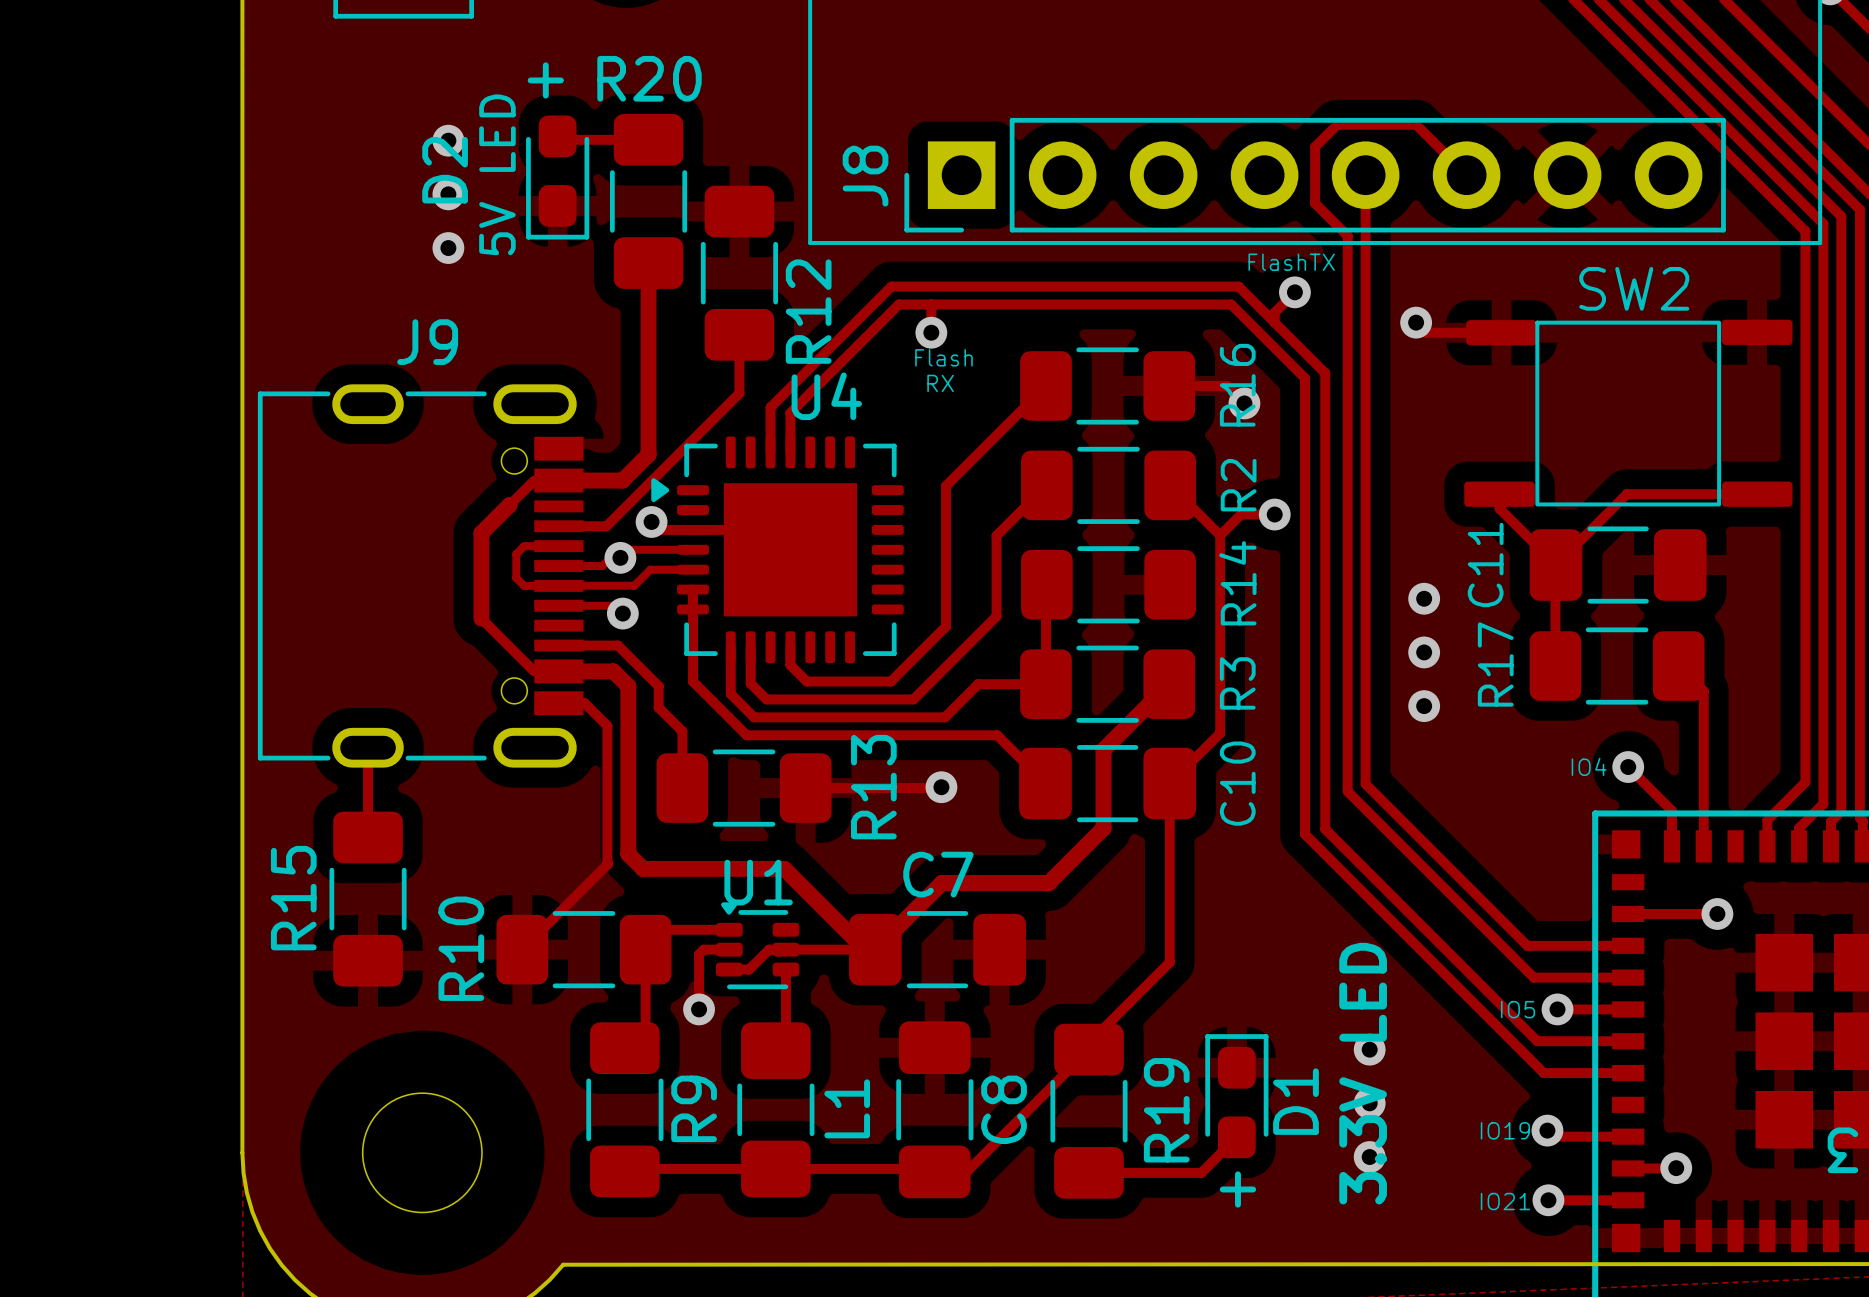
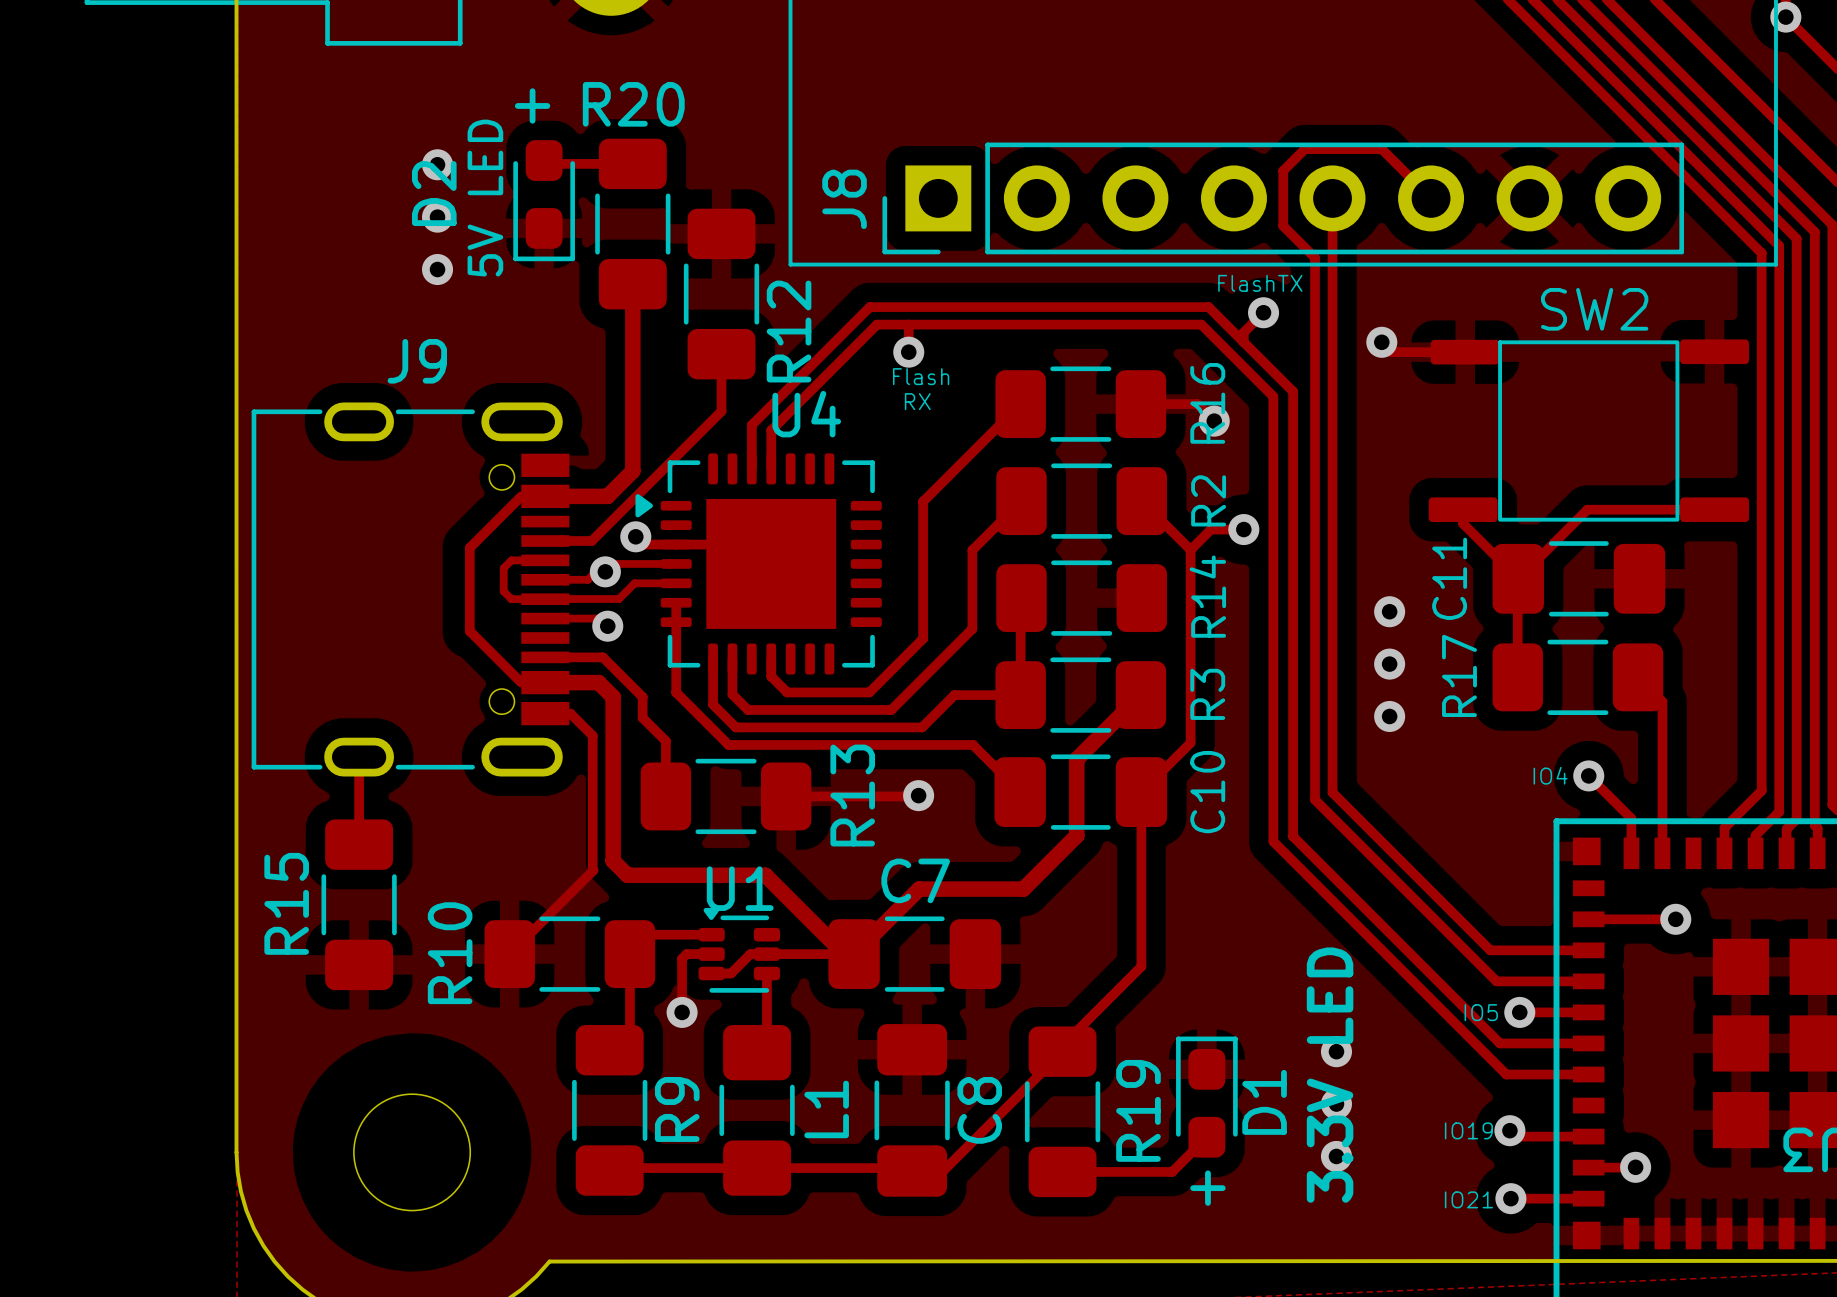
track width: thick (509, 505) (481, 533) (481, 618) -> thin (497, 520) (469, 547) (469, 631)

